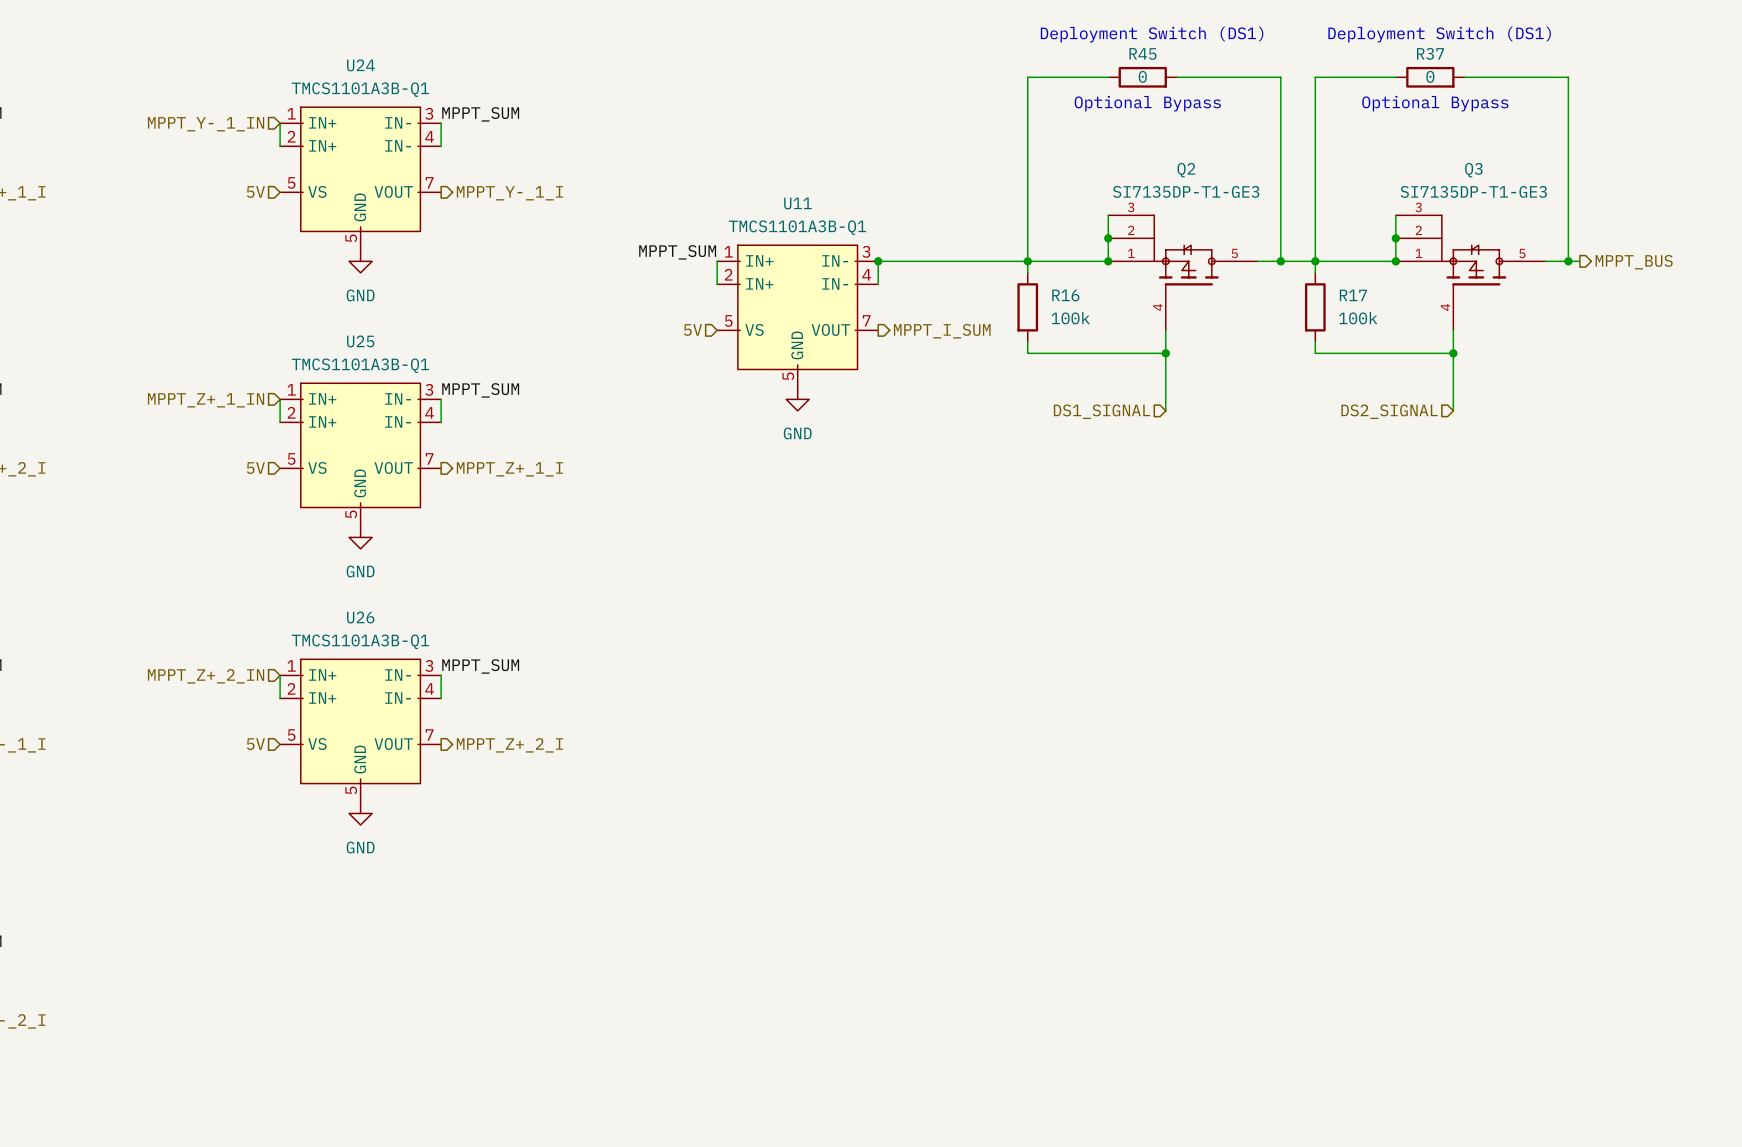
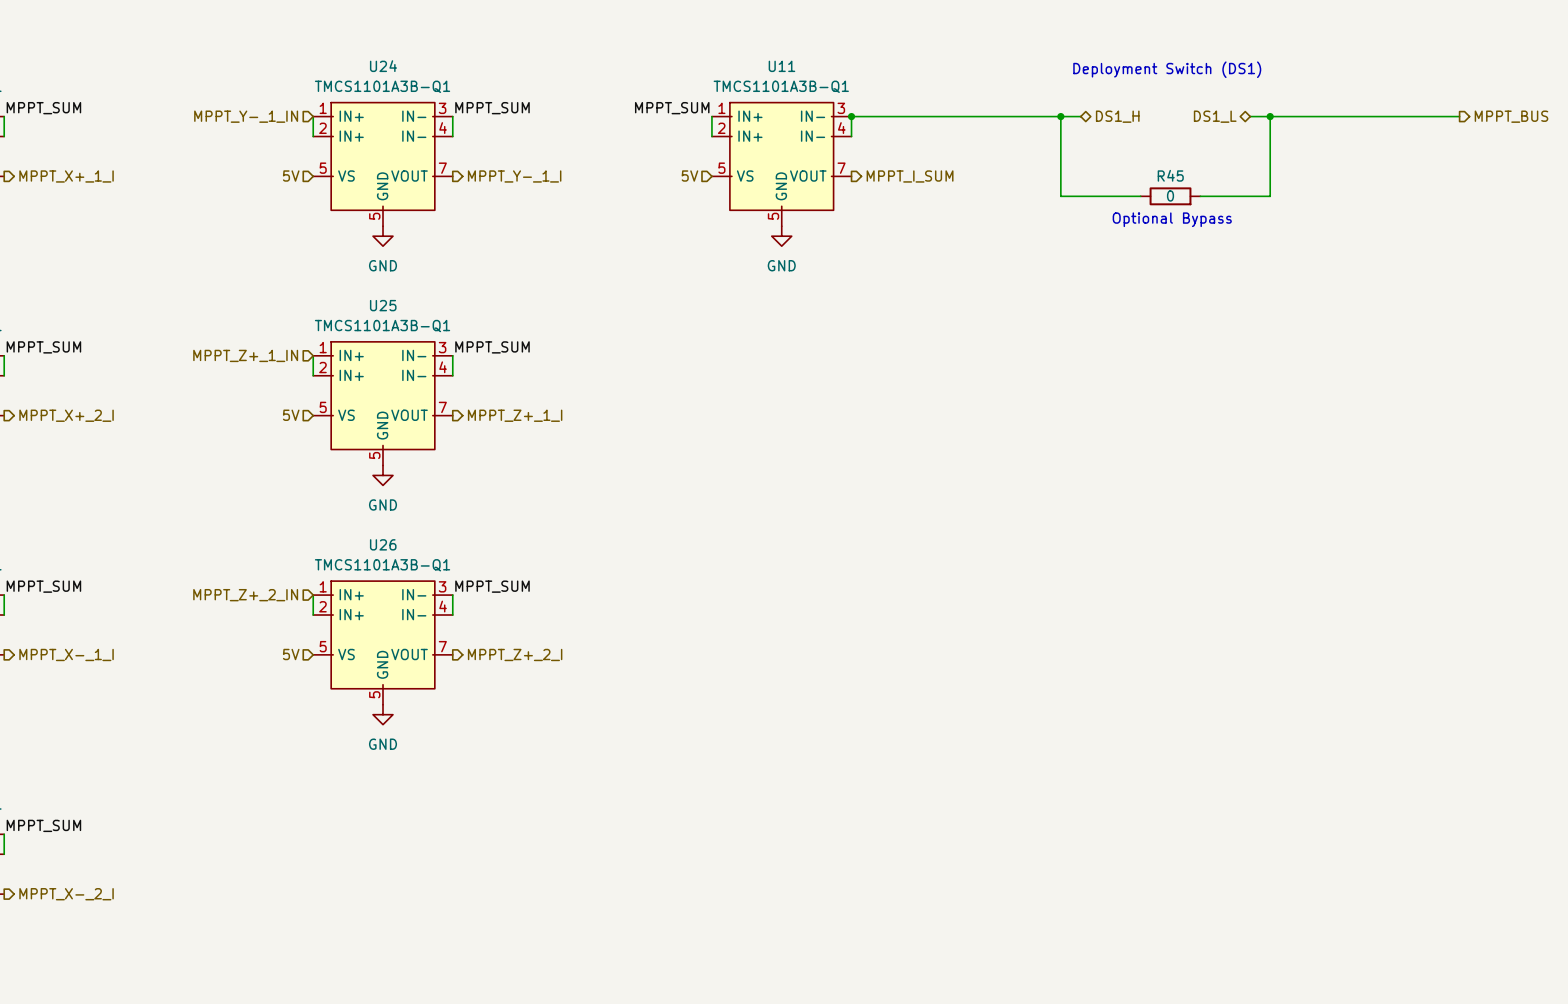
text: Deployment Switch (DS1) (1152, 34) -> none
text: Deployment Switch (DS1) (1439, 34) -> none
text: none -> Deployment Switch (DS1) (1167, 69)
wire: (1108, 77) (1027, 77) (1027, 272) -> none
R45 position: (1142, 77) -> (1170, 196)
wire: (1177, 77) (1280, 77) (1280, 261) -> none
wire: (1395, 77) (1315, 77) (1315, 272) -> none
R37: 0 (1430, 77) -> none
wire: (1464, 77) (1568, 77) (1568, 261) -> none
text: Optional Bypass (1147, 103) -> none
text: Optional Bypass (1435, 103) -> none
junction: none -> (851, 116)
wire: none -> (1060, 116) (1060, 196) (1140, 196)
junction: none -> (1060, 116)
wire: none -> (1080, 116) (851, 116) (851, 136)
wire: none -> (1250, 116) (1459, 116)
wire: none -> (1270, 116) (1270, 196) (1200, 196)
junction: none -> (1270, 116)
hierarchical label: none -> DS1_H (1117, 116)
hierarchical label: none -> DS1_L (1215, 116)
wire: (1108, 215) (1108, 261) (878, 261) (878, 284) -> none
wire: (1395, 215) (1395, 261) (1257, 261) -> none
junction: (1108, 238) -> none
junction: (1395, 238) -> none
text: none -> Optional Bypass (1172, 219)
label position: MPPT_SUM (677, 252) -> MPPT_SUM (672, 108)
wire: (717, 261) (717, 284) -> (711, 116) (711, 136)
junction: (878, 261) -> none
junction: (1027, 261) -> none
junction: (1108, 261) -> none
junction: (1280, 261) -> none
junction: (1315, 261) -> none
junction: (1395, 261) -> none
wire: (1545, 261) (1579, 261) -> none
junction: (1568, 261) -> none
hierarchical label position: MPPT_BUS (1634, 262) -> MPPT_BUS (1511, 116)
Q2: SI7135DP-T1-GE3 (1183, 272) -> none
Q3: SI7135DP-T1-GE3 (1470, 272) -> none
R16: 100k (1027, 307) -> none
R17: 100k (1315, 307) -> none
U11 position: (797, 316) -> (781, 164)
hierarchical label position: 5V (692, 330) -> 5V (689, 176)
wire: (1165, 330) (1165, 410) -> none
wire: (1453, 330) (1453, 410) -> none
hierarchical label position: MPPT_I_SUM (942, 331) -> MPPT_I_SUM (910, 176)
wire: (1027, 341) (1027, 353) (1165, 353) -> none
wire: (1315, 341) (1315, 353) (1453, 353) -> none
junction: (1165, 353) -> none
junction: (1453, 353) -> none
power symbol position: GND (797, 399) -> GND (781, 236)
hierarchical label: DS1_SIGNAL (1101, 411) -> none
hierarchical label: DS2_SIGNAL (1389, 411) -> none

